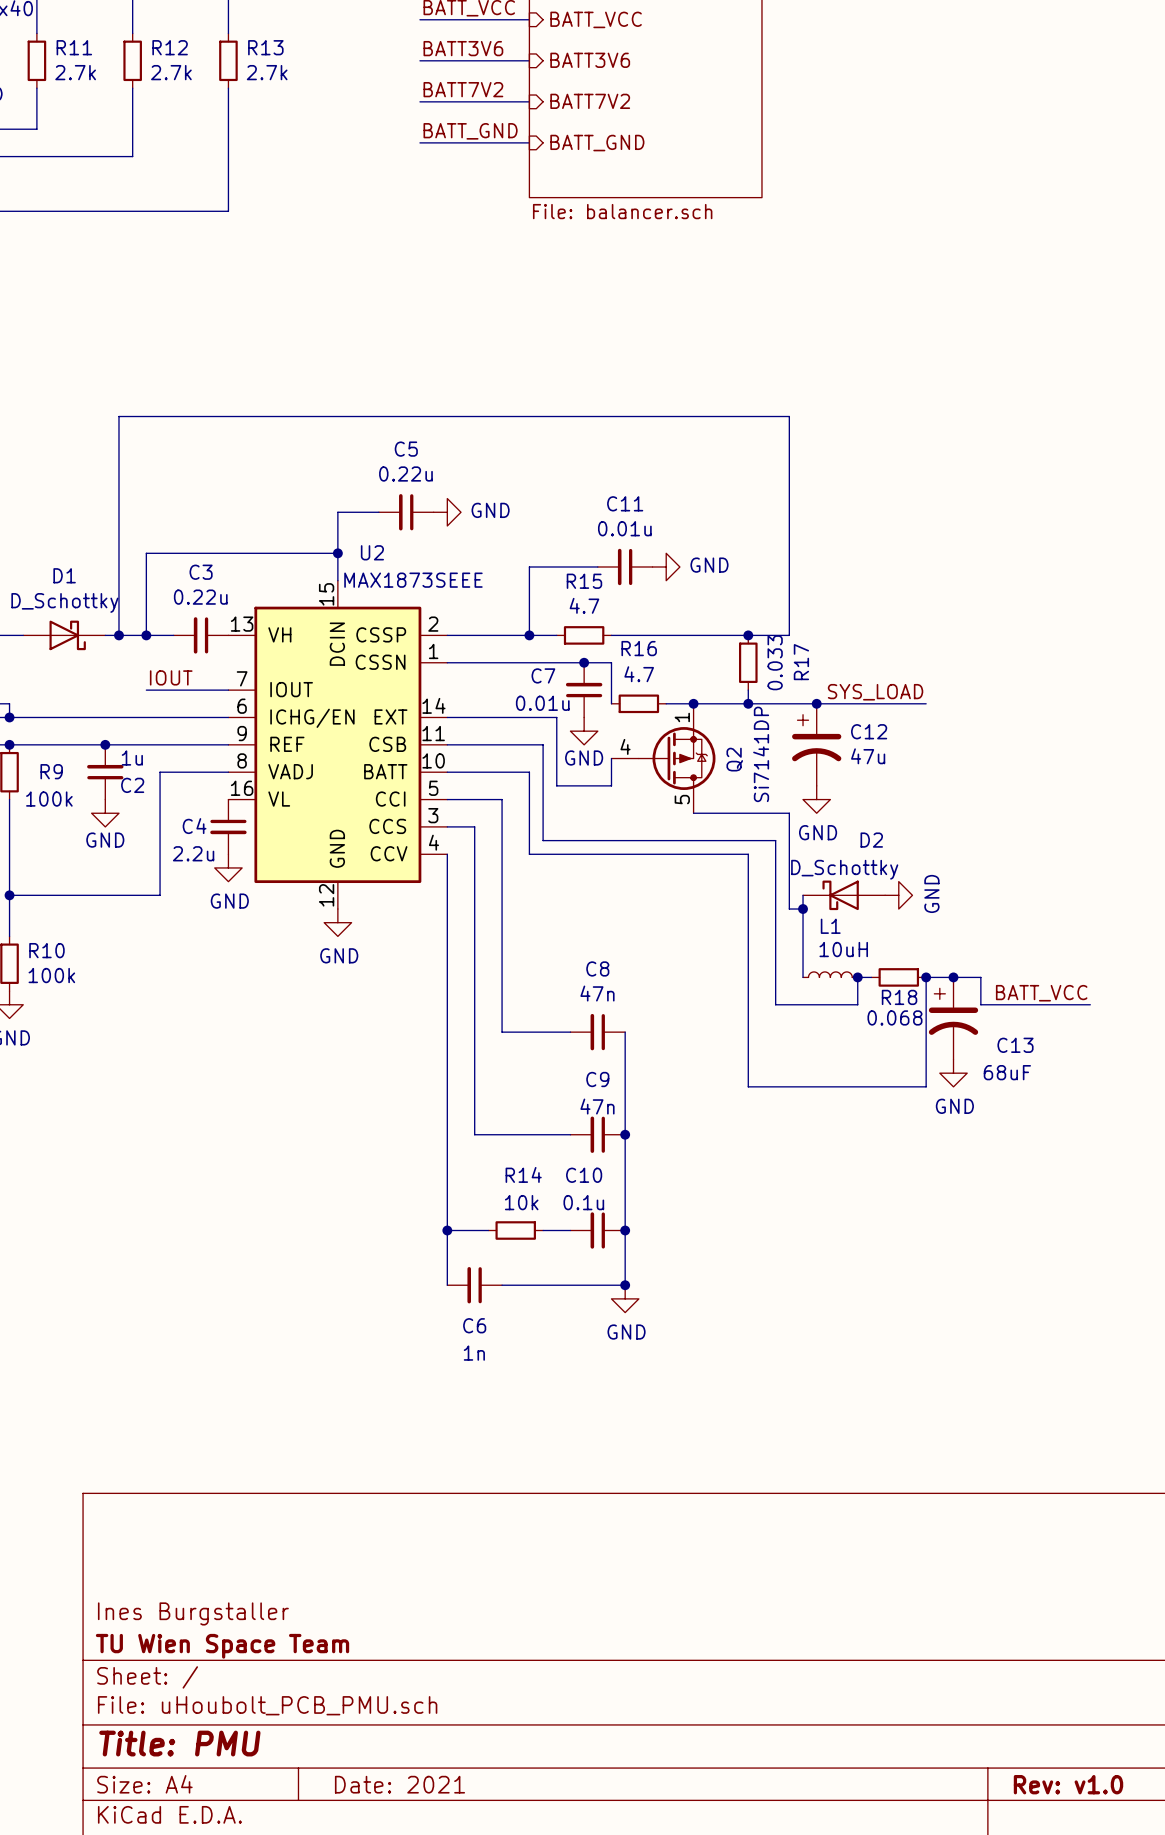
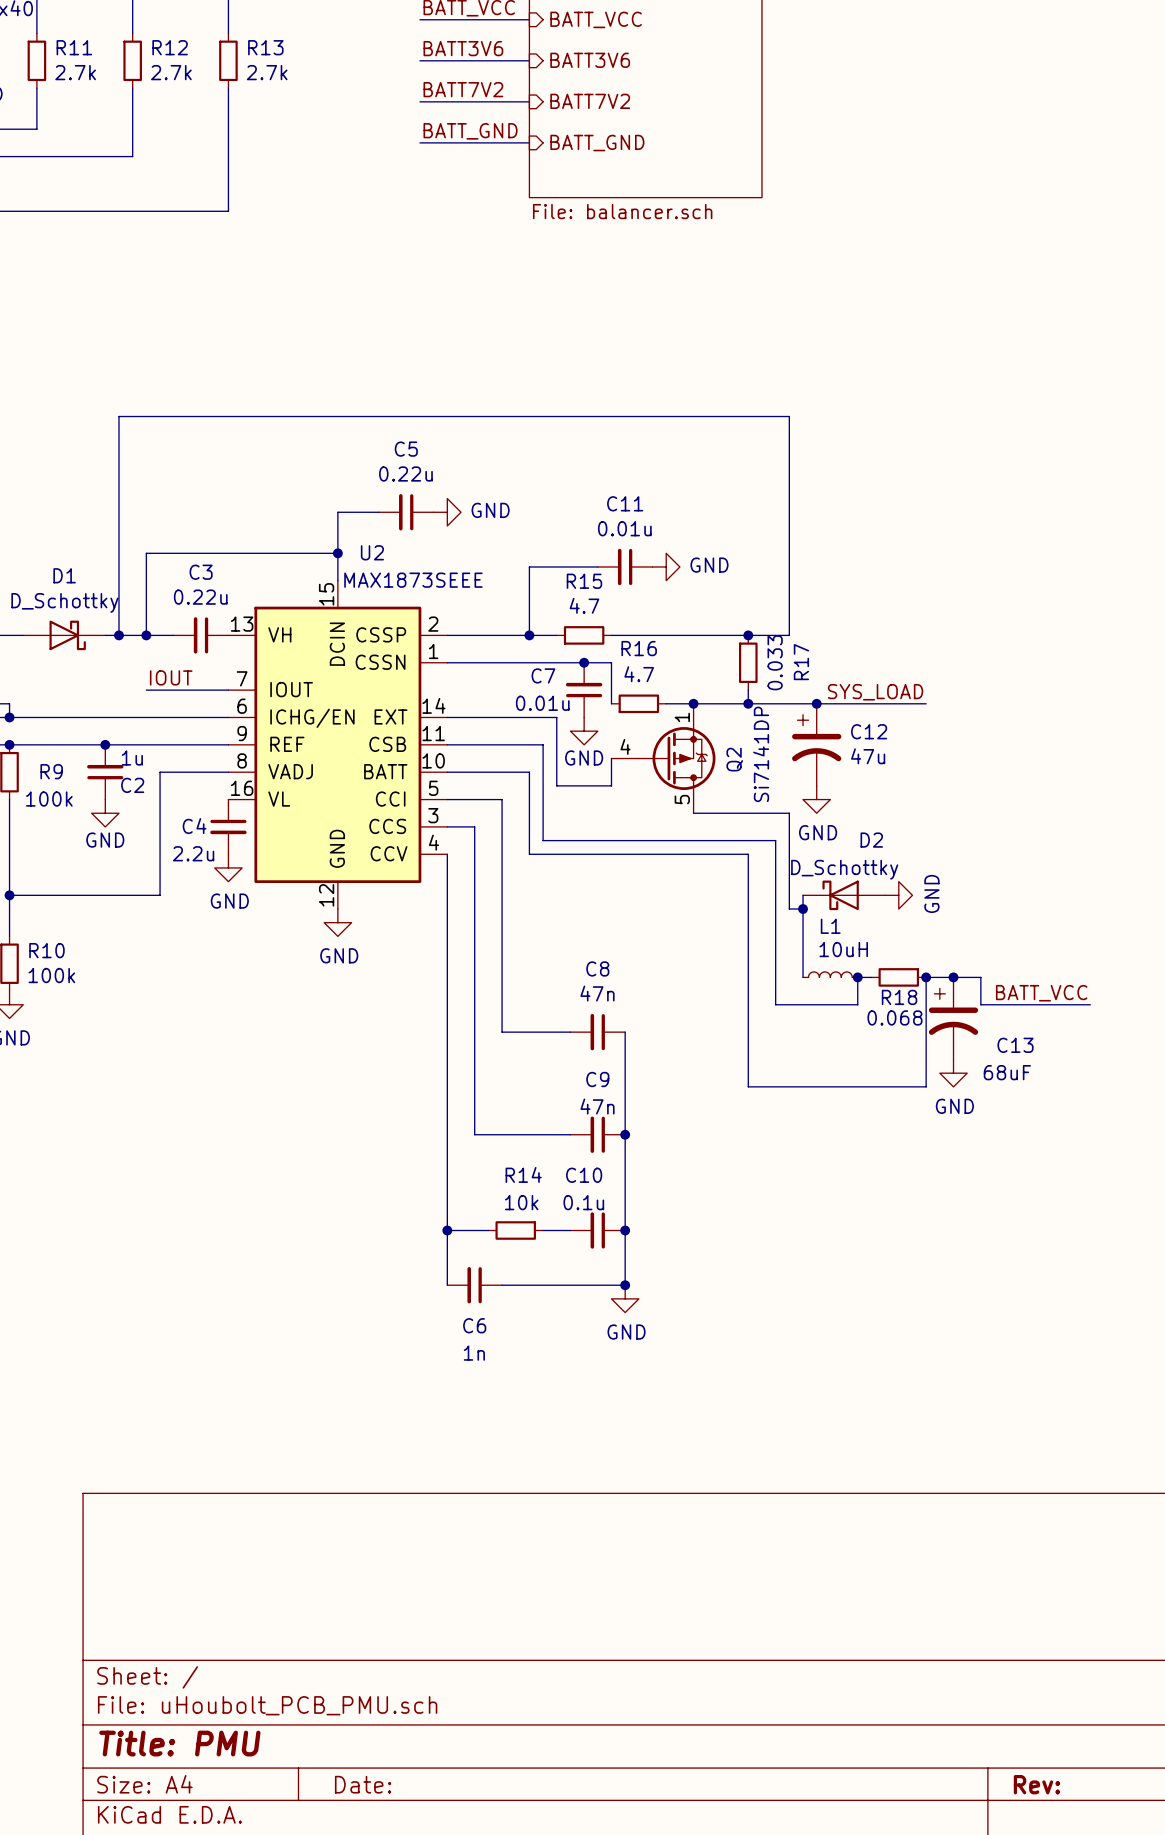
title block: Ines Burgstaller (193, 1613) -> none
title block: TU Wien Space Team (222, 1646) -> none
title block: Date: 2021 (399, 1784) -> Date: (363, 1784)
title block: Rev: v1.0 (1068, 1784) -> Rev: (1036, 1784)

